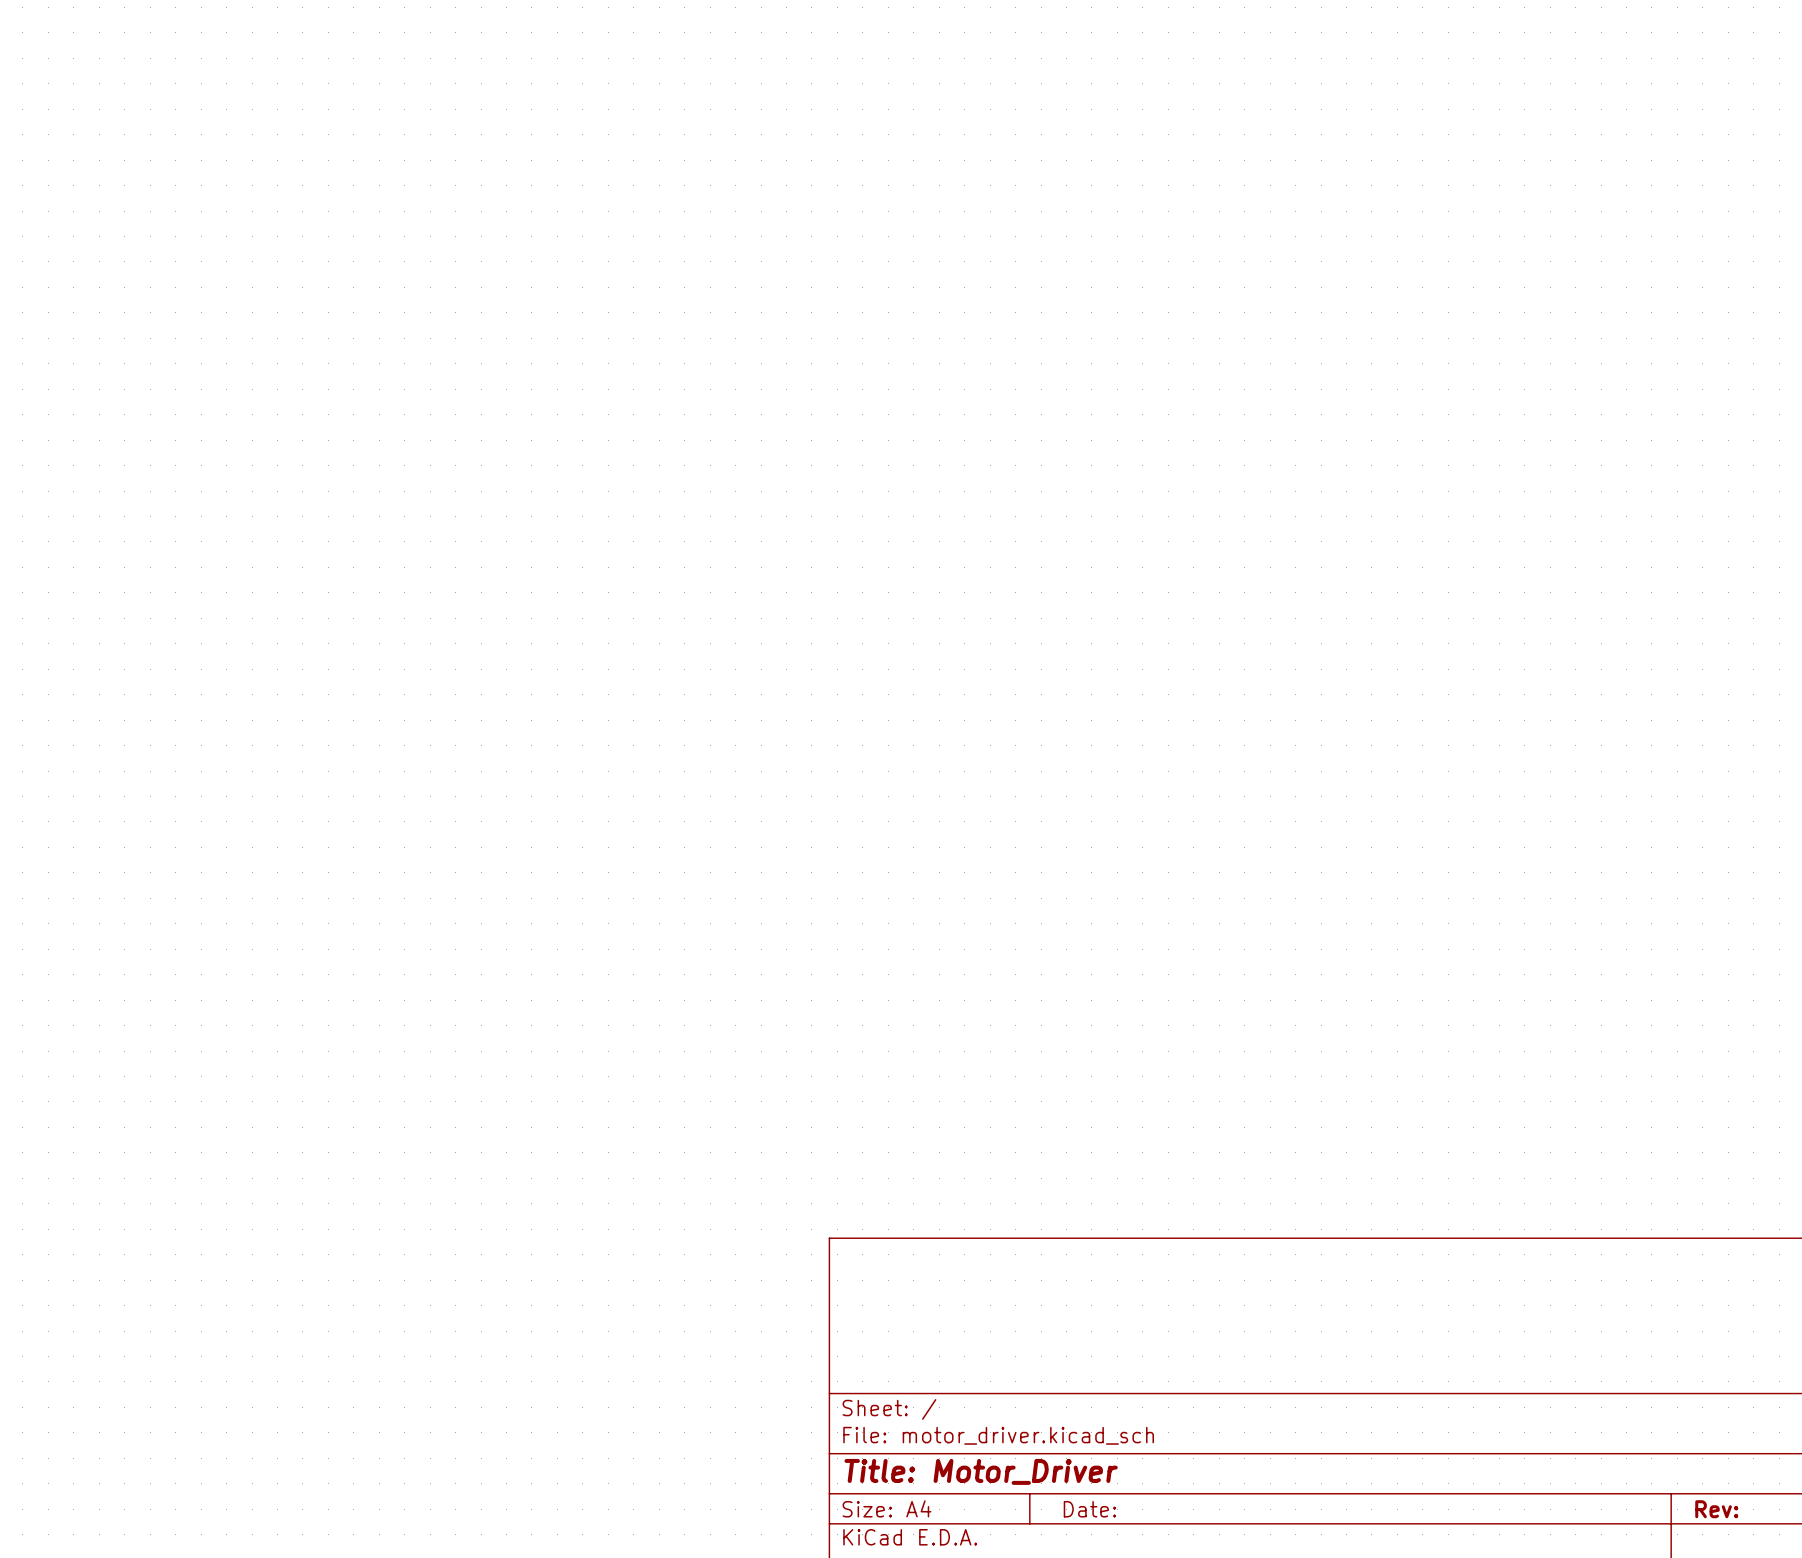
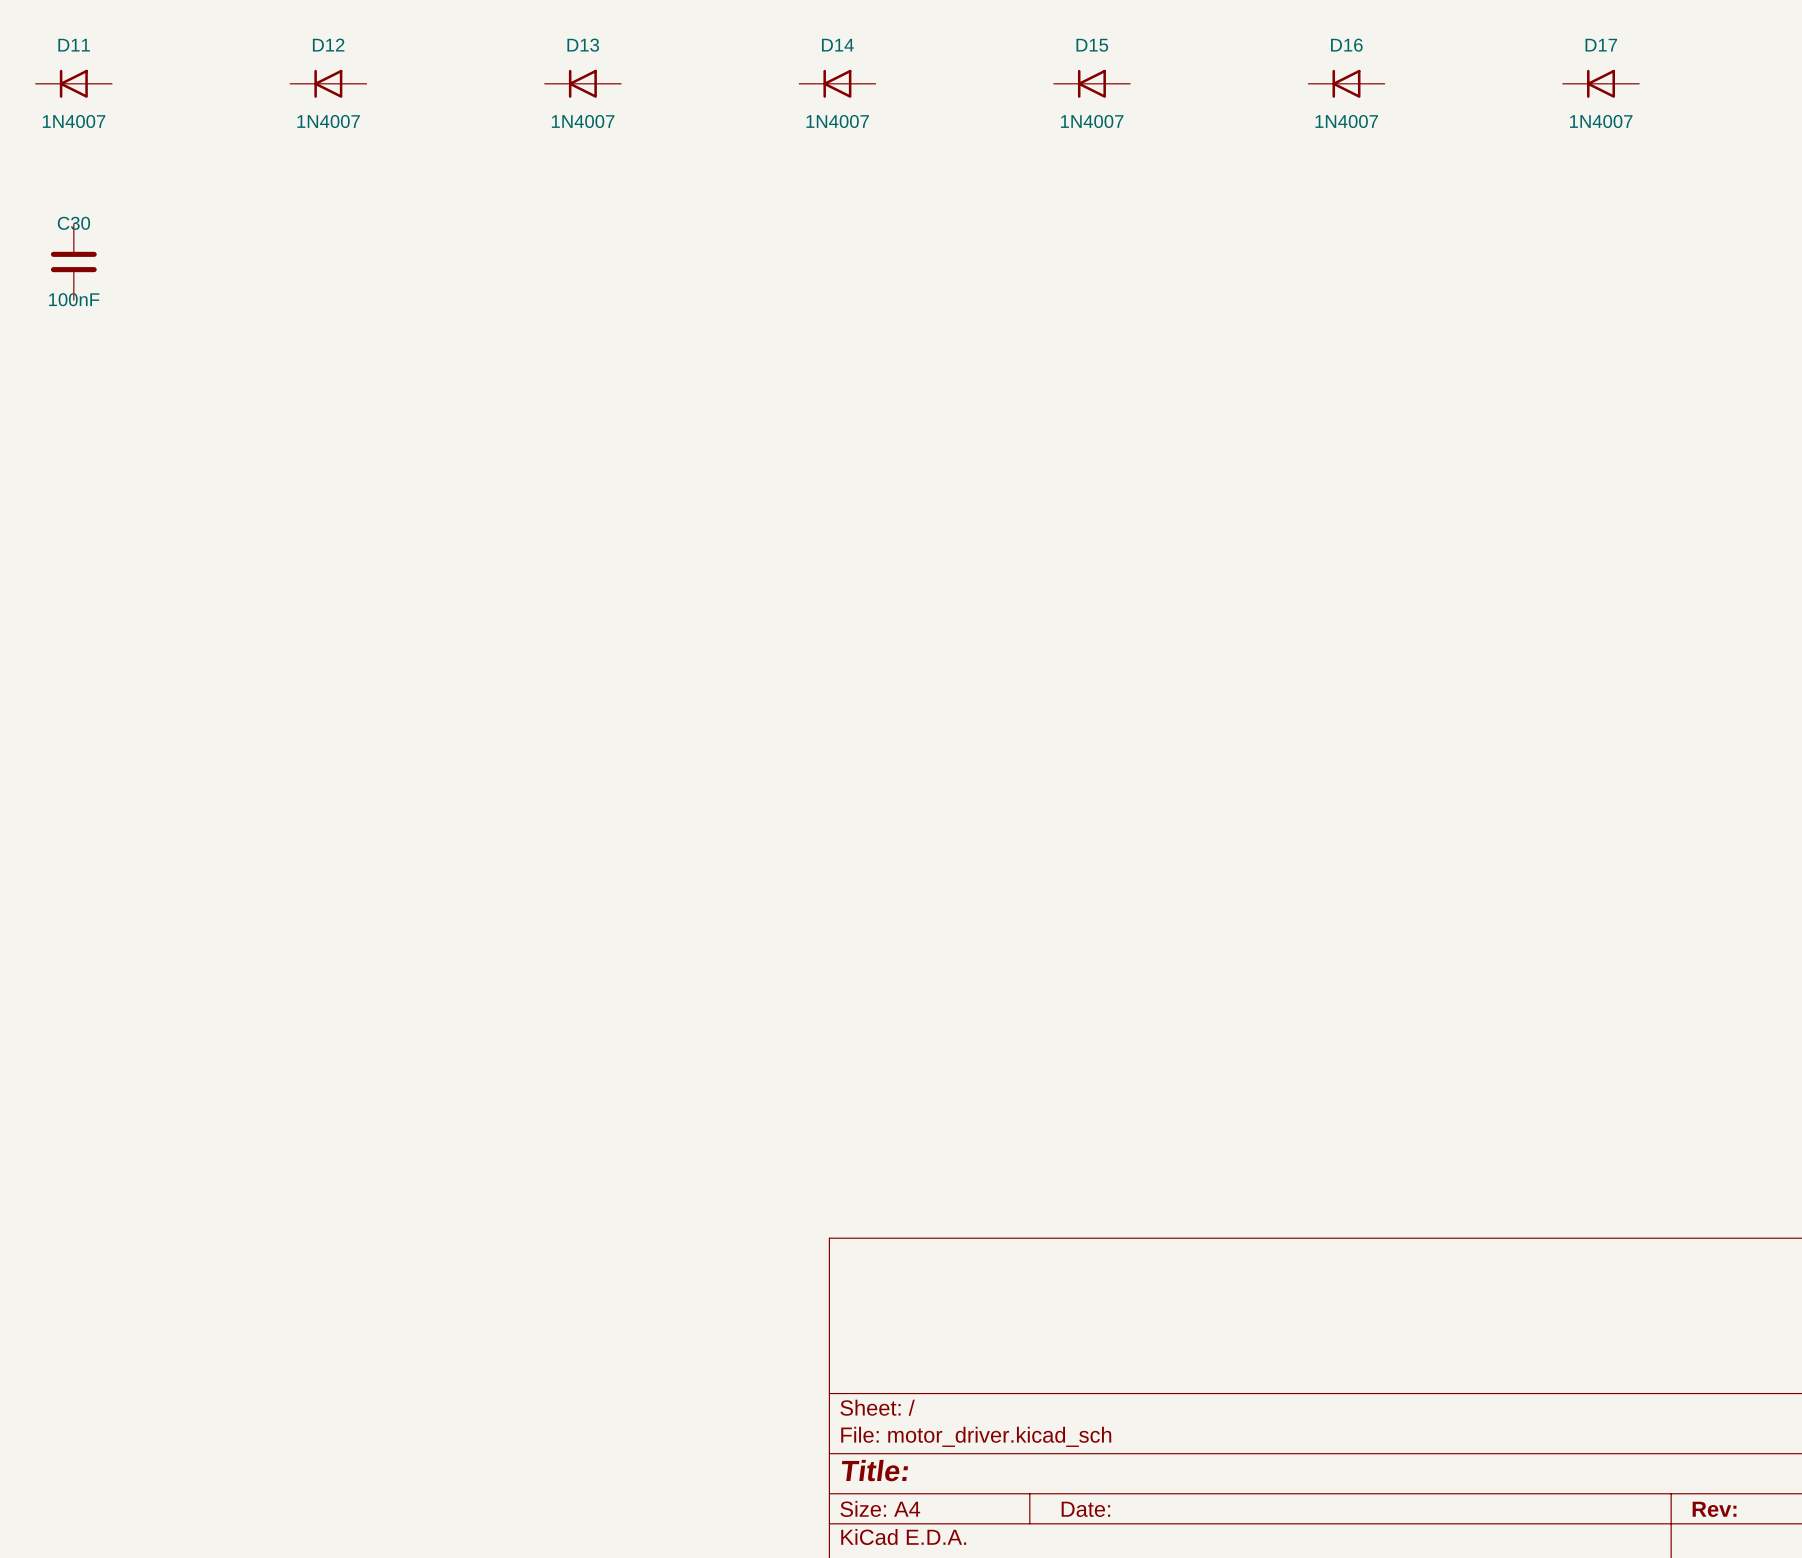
D11: none -> 1N4007 (73, 83)
D12: none -> 1N4007 (328, 83)
D13: none -> 1N4007 (582, 83)
D14: none -> 1N4007 (837, 83)
D15: none -> 1N4007 (1091, 83)
D16: none -> 1N4007 (1346, 83)
D17: none -> 1N4007 (1601, 83)
C30: none -> 100nF (73, 261)
title block: Title: Motor_Driver (981, 1471) -> Title: (874, 1470)

